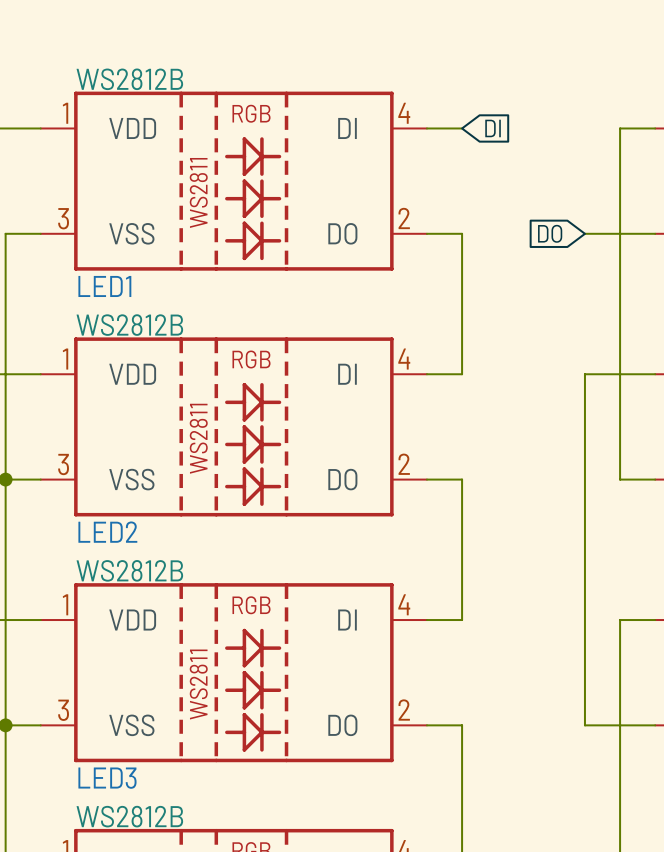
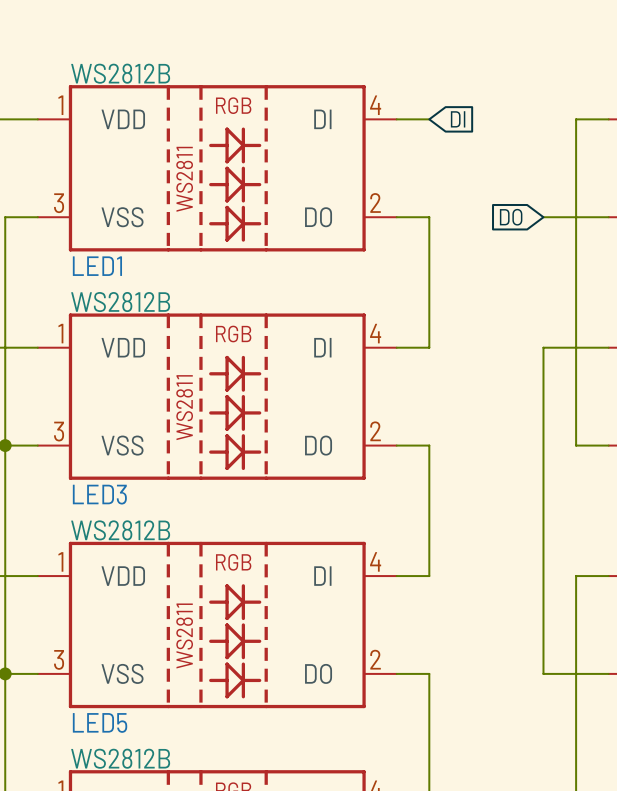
LED2 name: LED2 (107, 532) -> LED3 (99, 494)
LED3 name: LED3 (107, 778) -> LED5 (100, 722)

